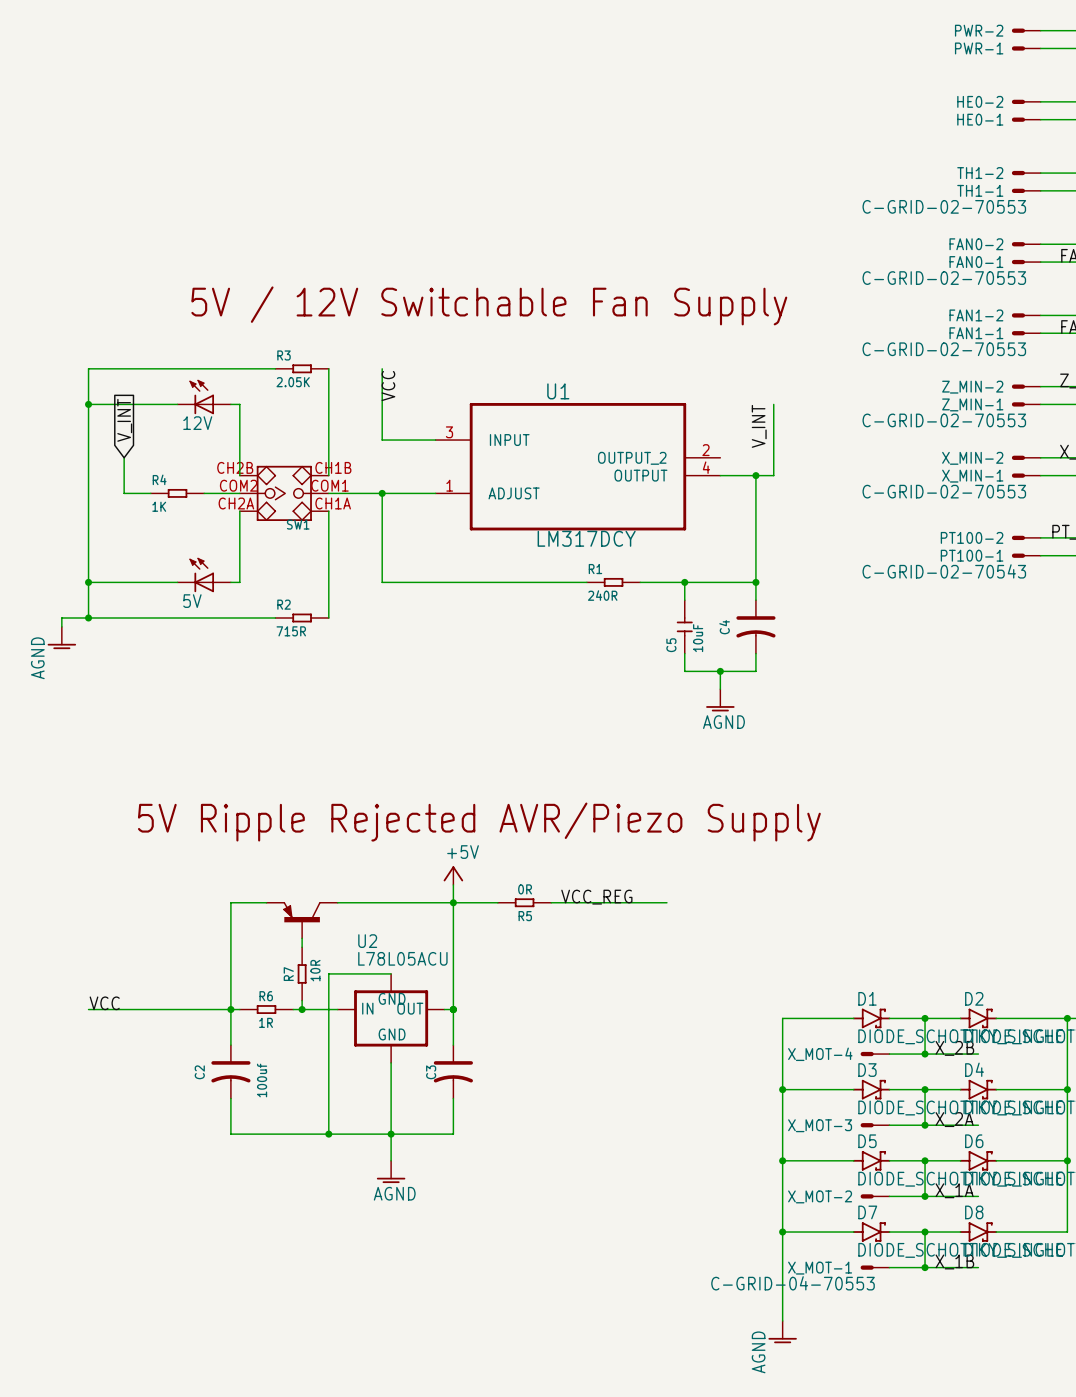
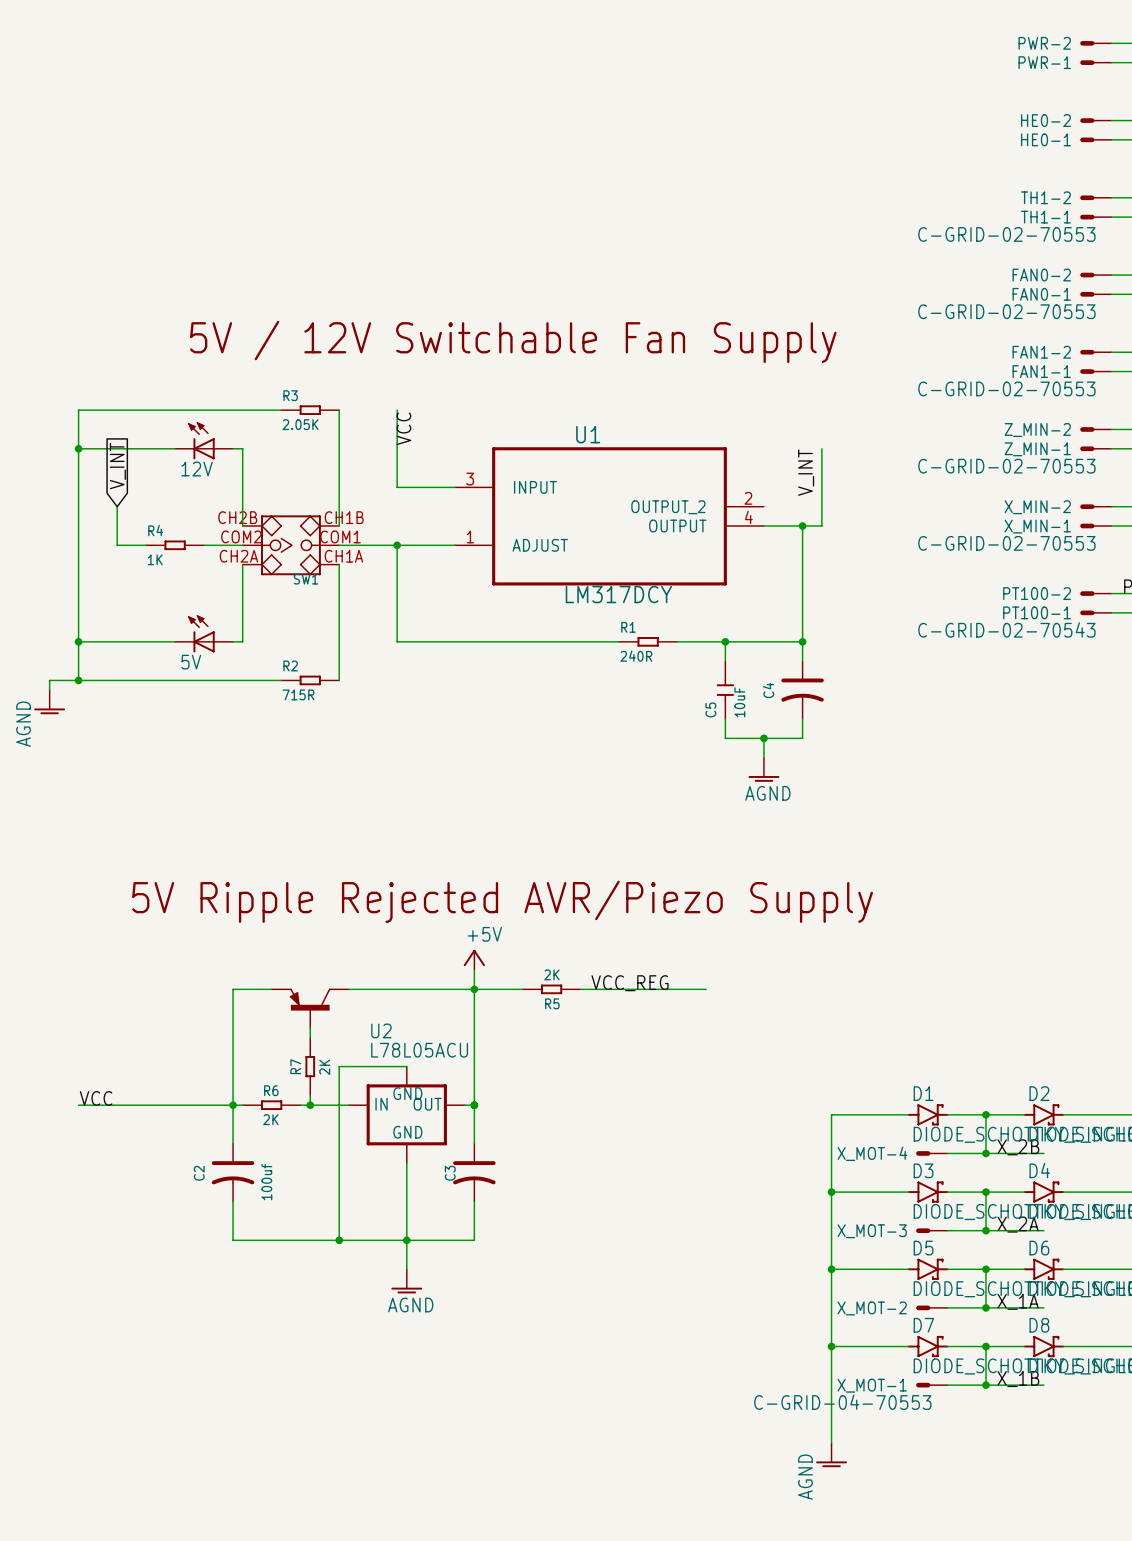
R5 value: 0R (525, 889) -> 2K (551, 974)
R7 value: 10R (315, 970) -> 2K (324, 1067)
R6 value: 1R (266, 1022) -> 2K (270, 1119)

